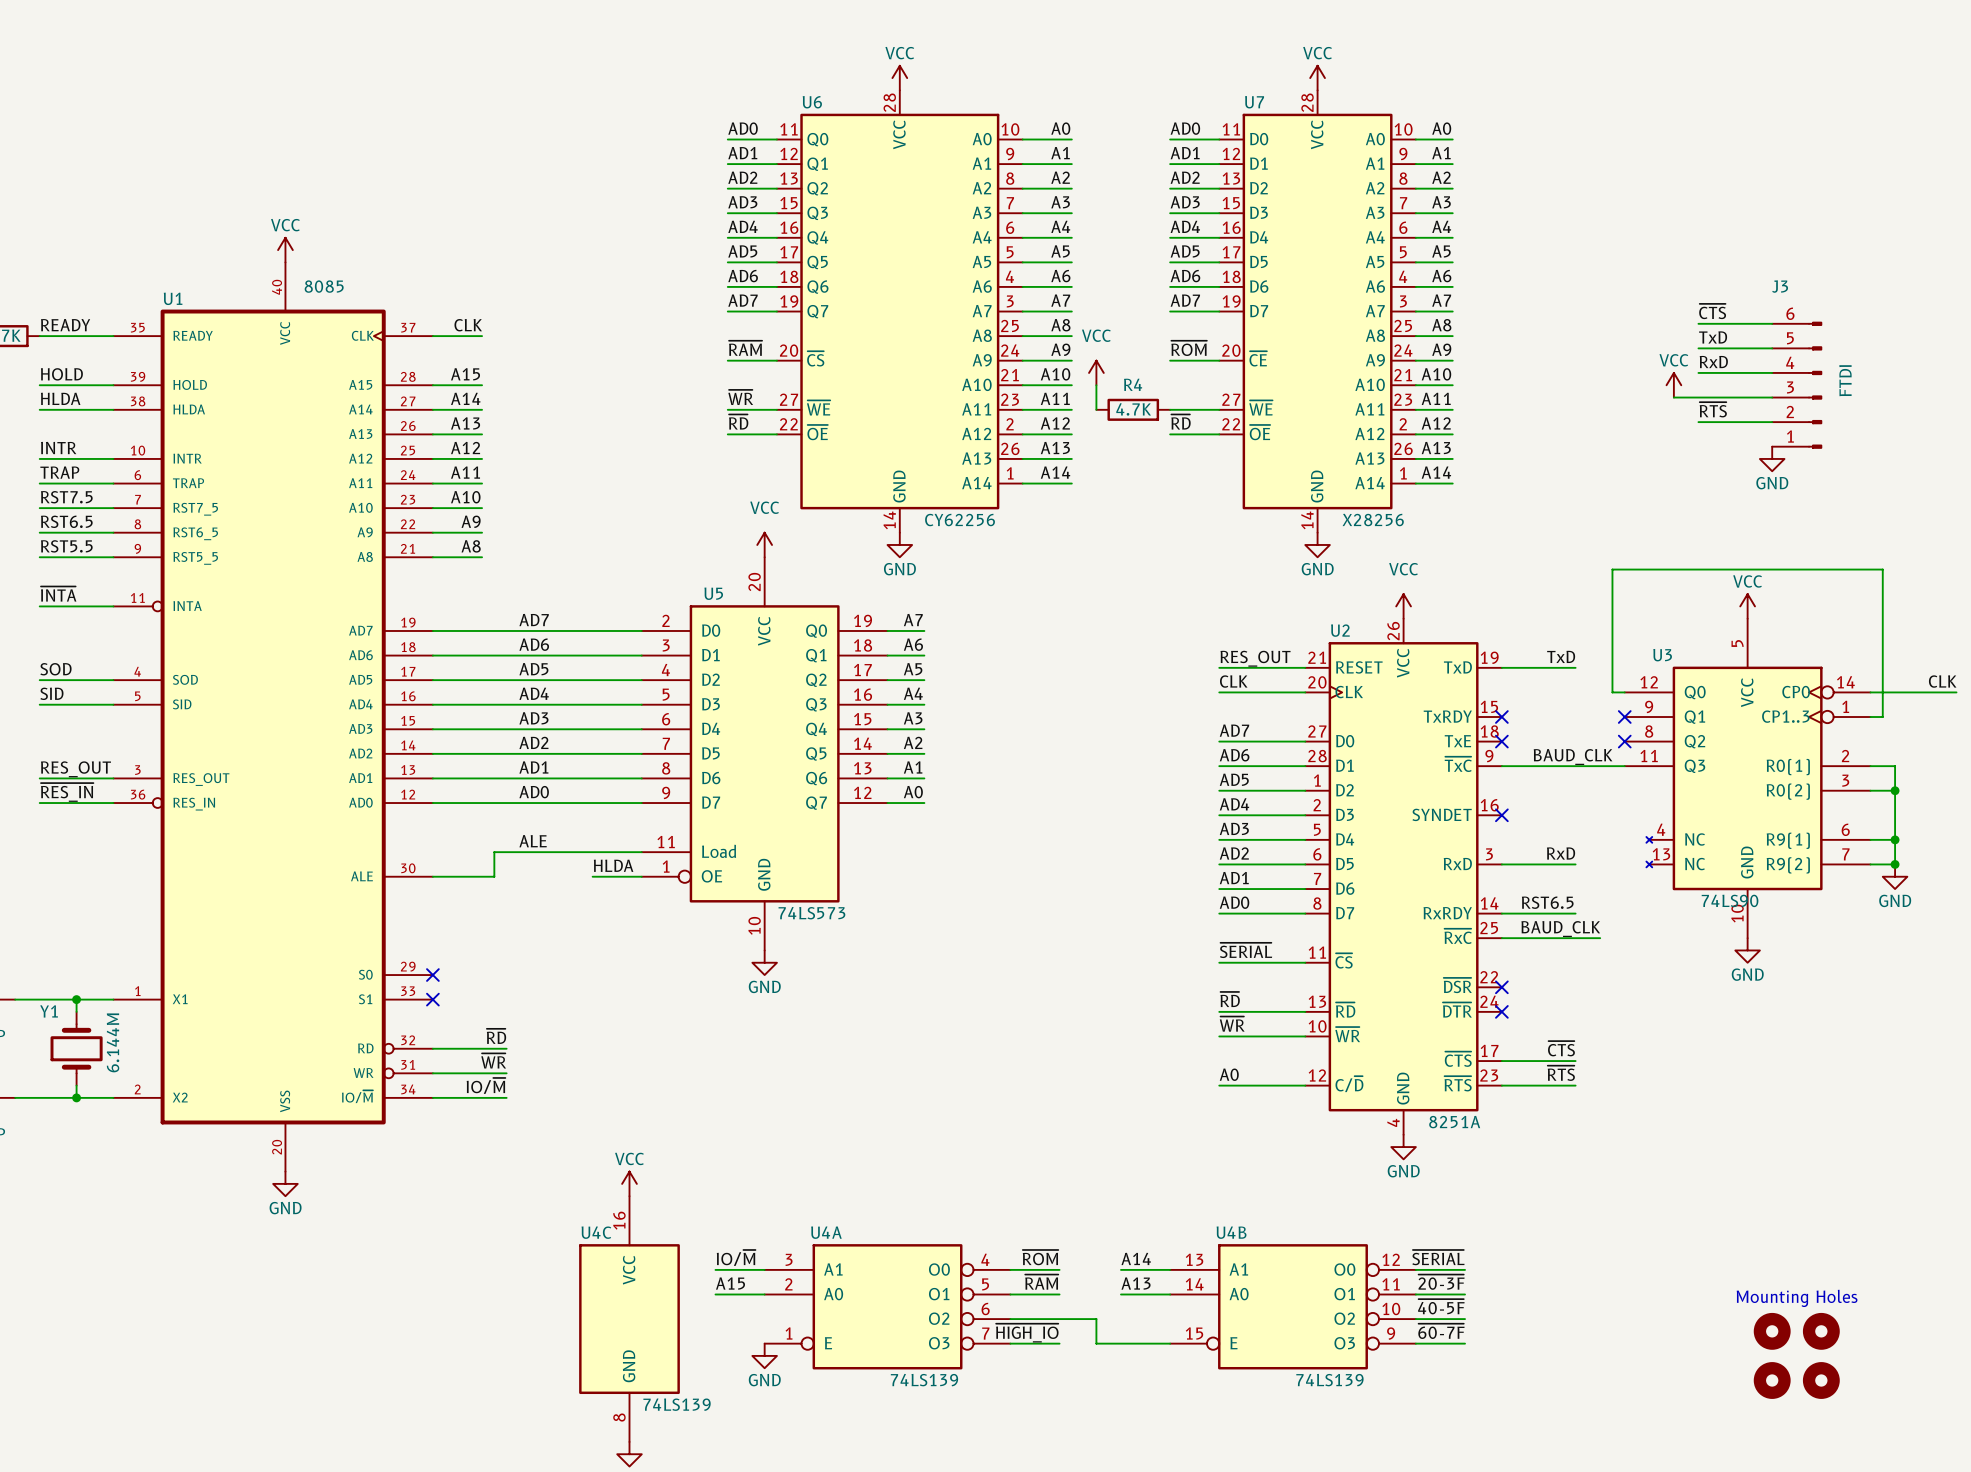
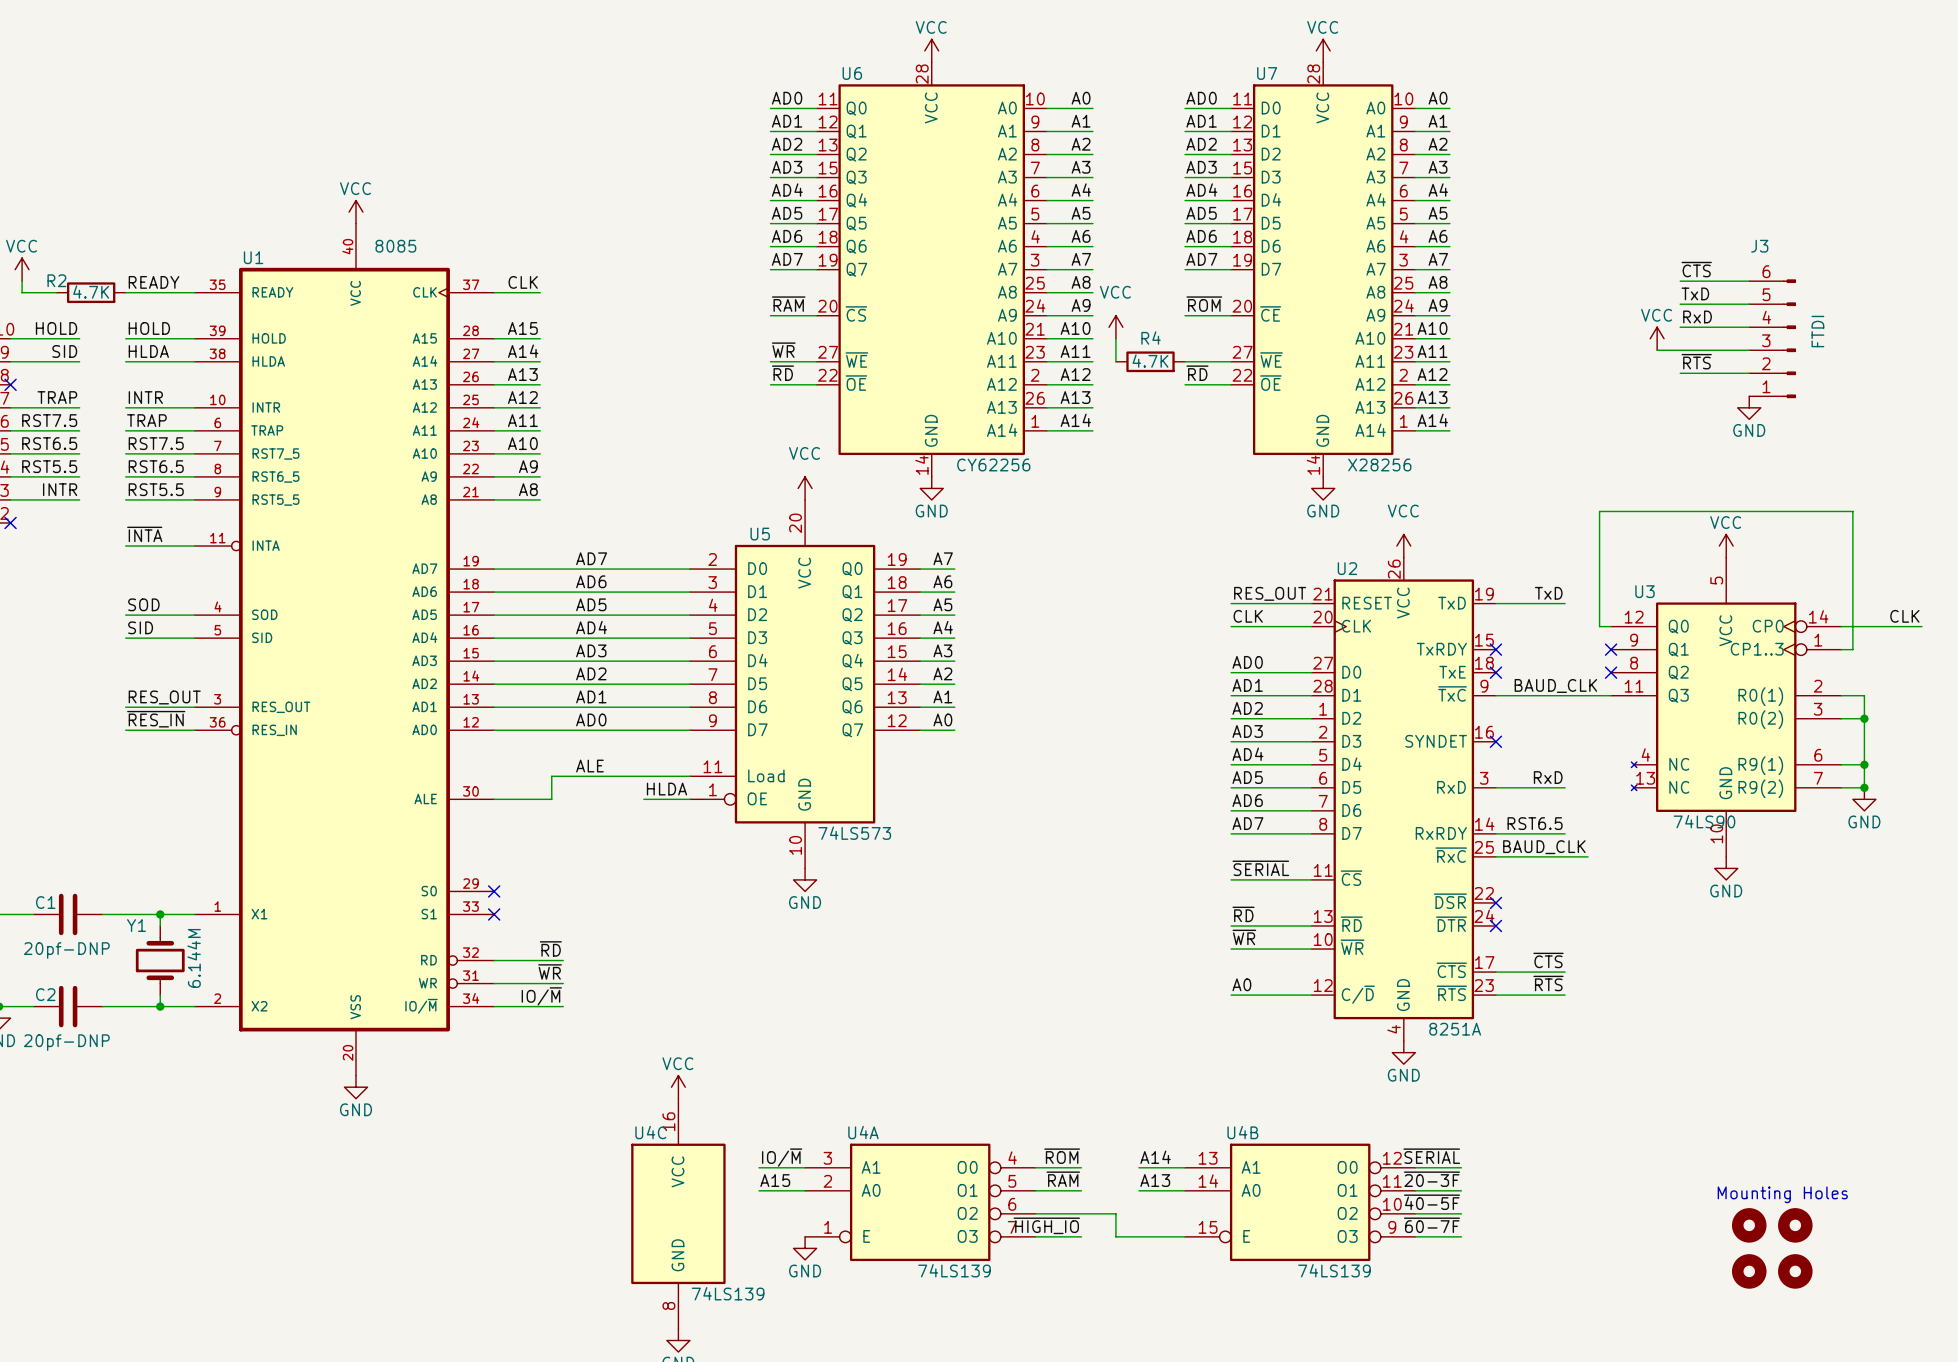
label: AD7 (1234, 730) -> AD0 (1247, 662)
label: AD6 (1234, 755) -> AD1 (1247, 685)
label: AD5 (1234, 779) -> AD2 (1247, 708)
label: AD4 (1234, 804) -> AD3 (1247, 731)
label: AD3 (1234, 828) -> AD4 (1247, 754)
label: AD2 (1234, 853) -> AD5 (1247, 777)
label: AD1 (1234, 878) -> AD6 (1247, 800)
label: AD0 (1234, 902) -> AD7 (1247, 823)

